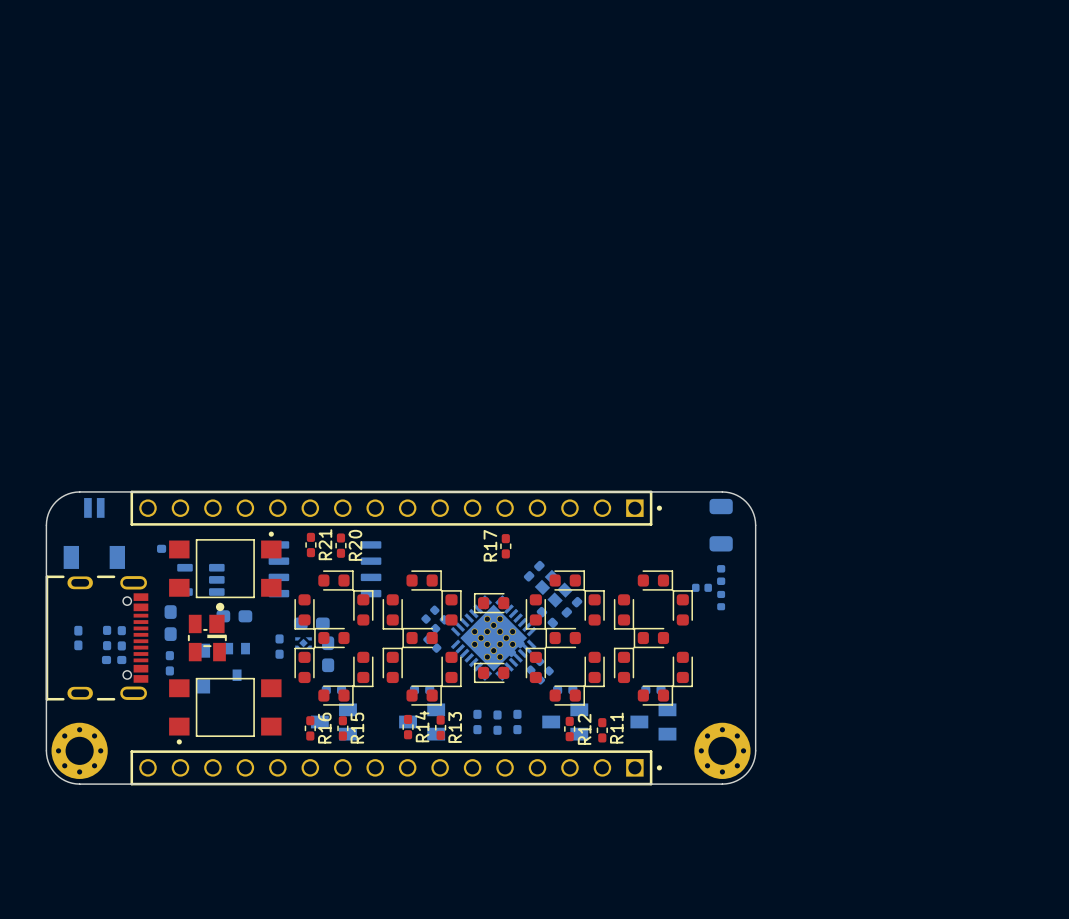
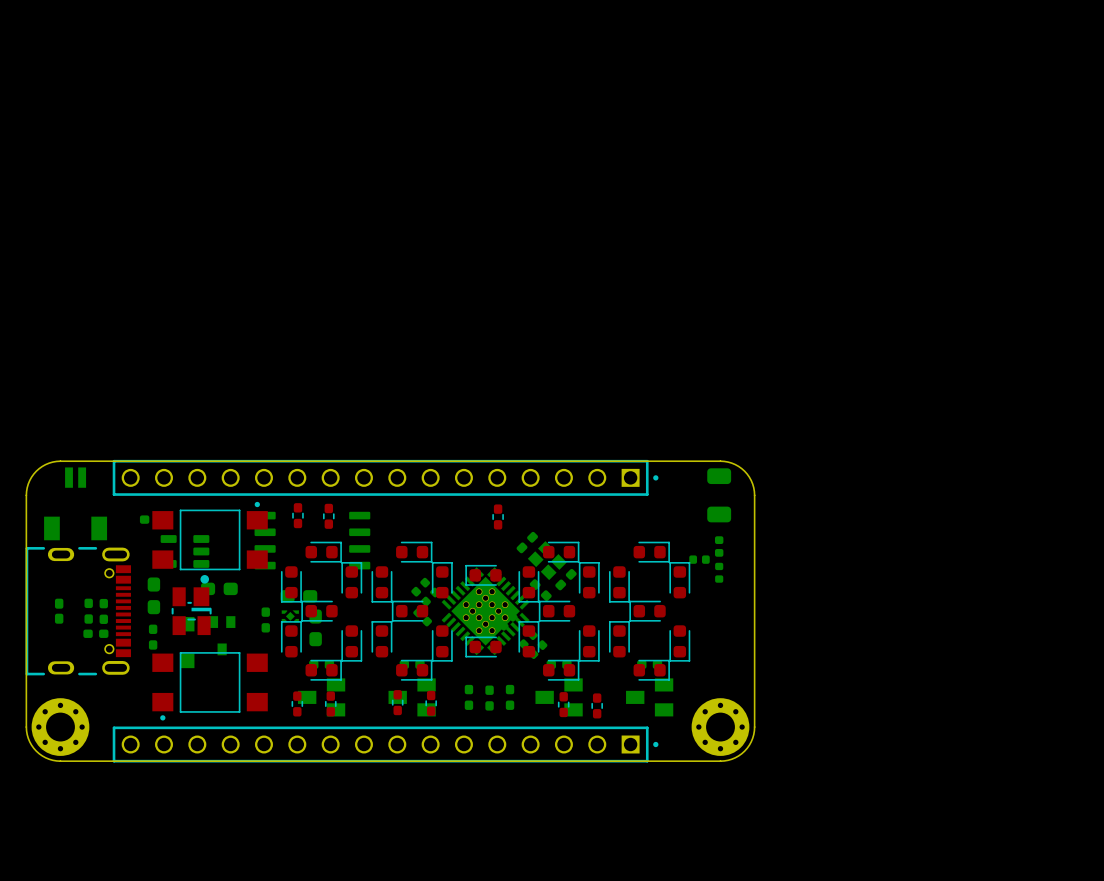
R21 name: R21 (325, 544) -> none
R20 name: R20 (355, 545) -> none
R17 name: R17 (490, 545) -> none
R14 name: R14 (422, 726) -> none
R13 name: R13 (455, 727) -> none
R16 name: R16 (324, 728) -> none
R15 name: R15 (357, 728) -> none
R11 name: R11 (616, 728) -> none
R12 name: R12 (584, 729) -> none

